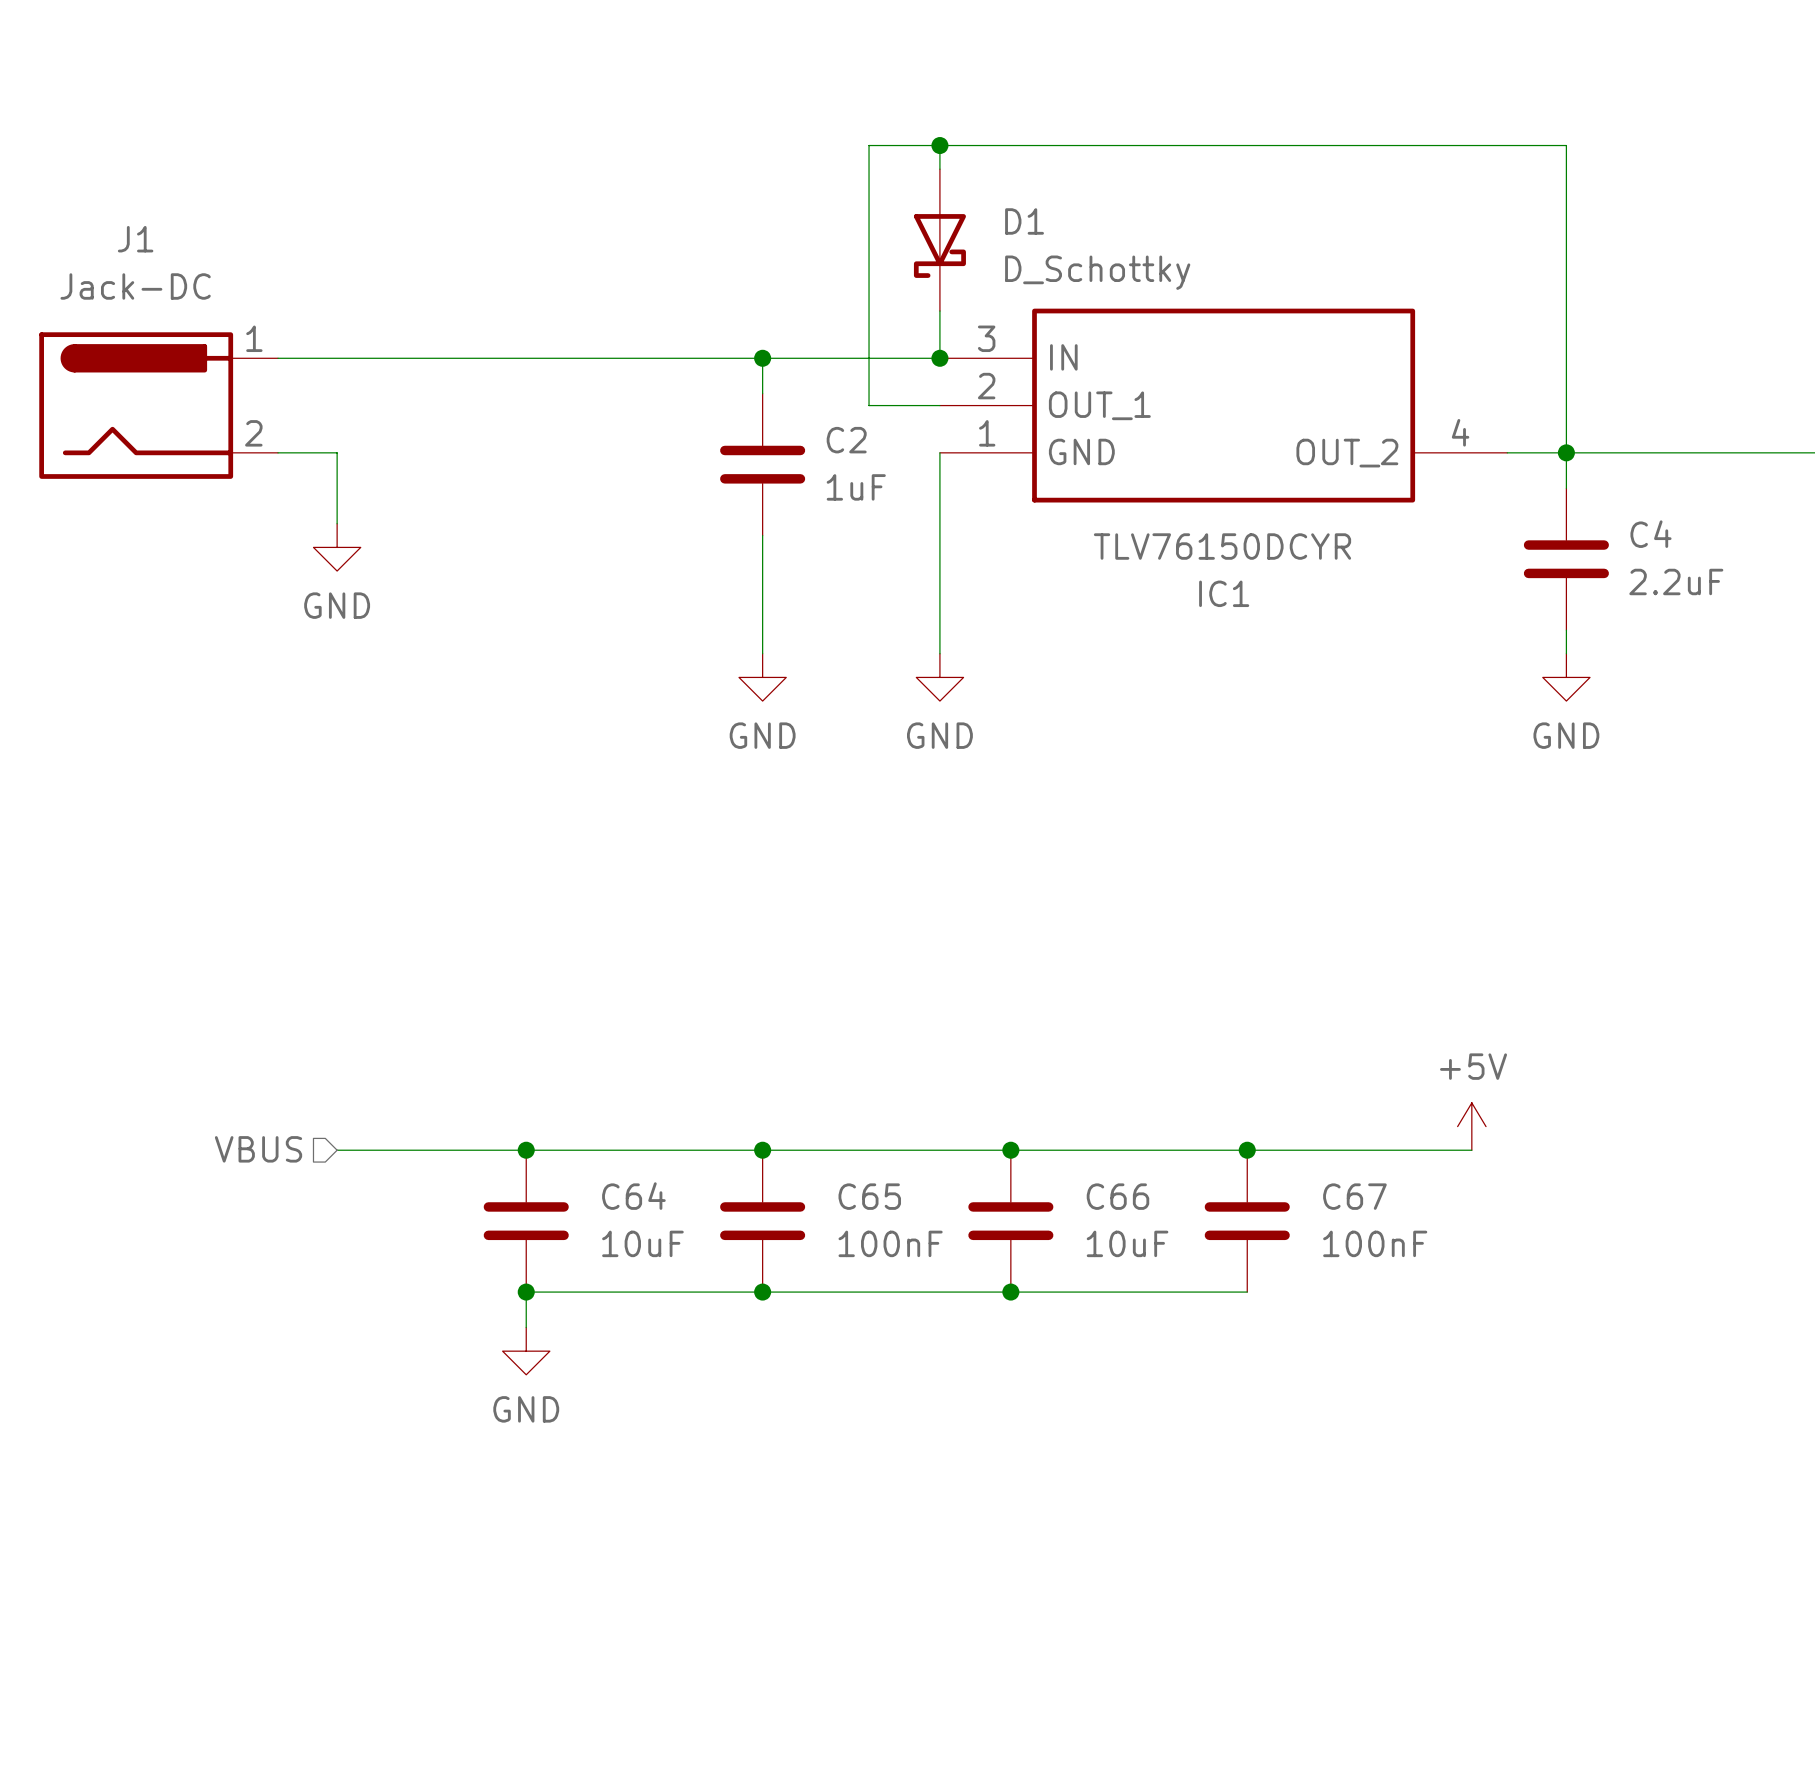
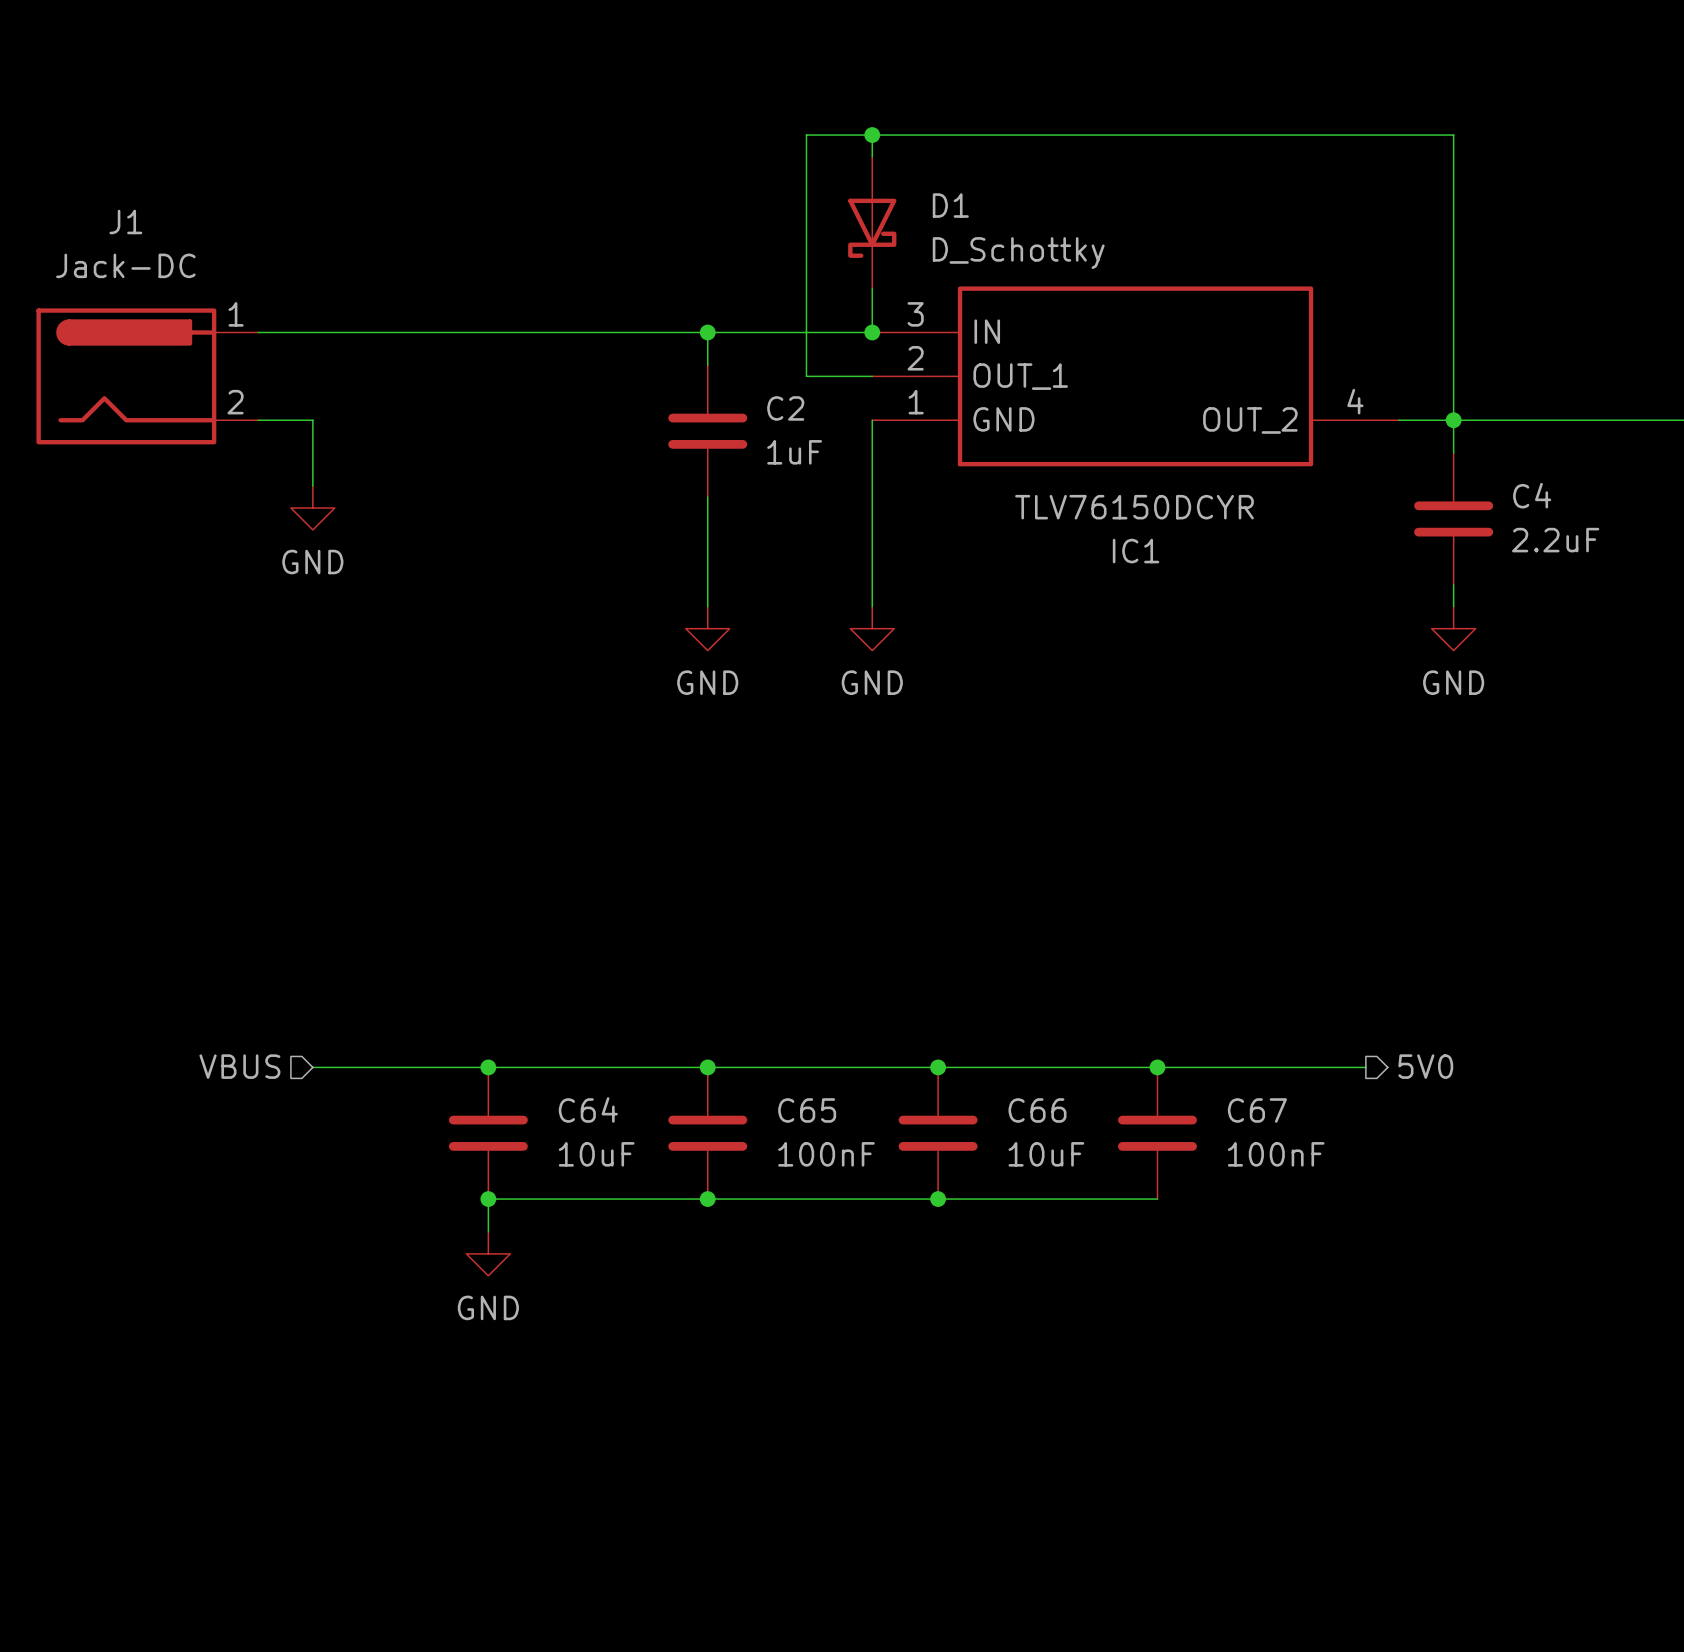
power symbol: +5V (1471, 1126) -> none
hierarchical label: none -> 5V0 (1425, 1066)

